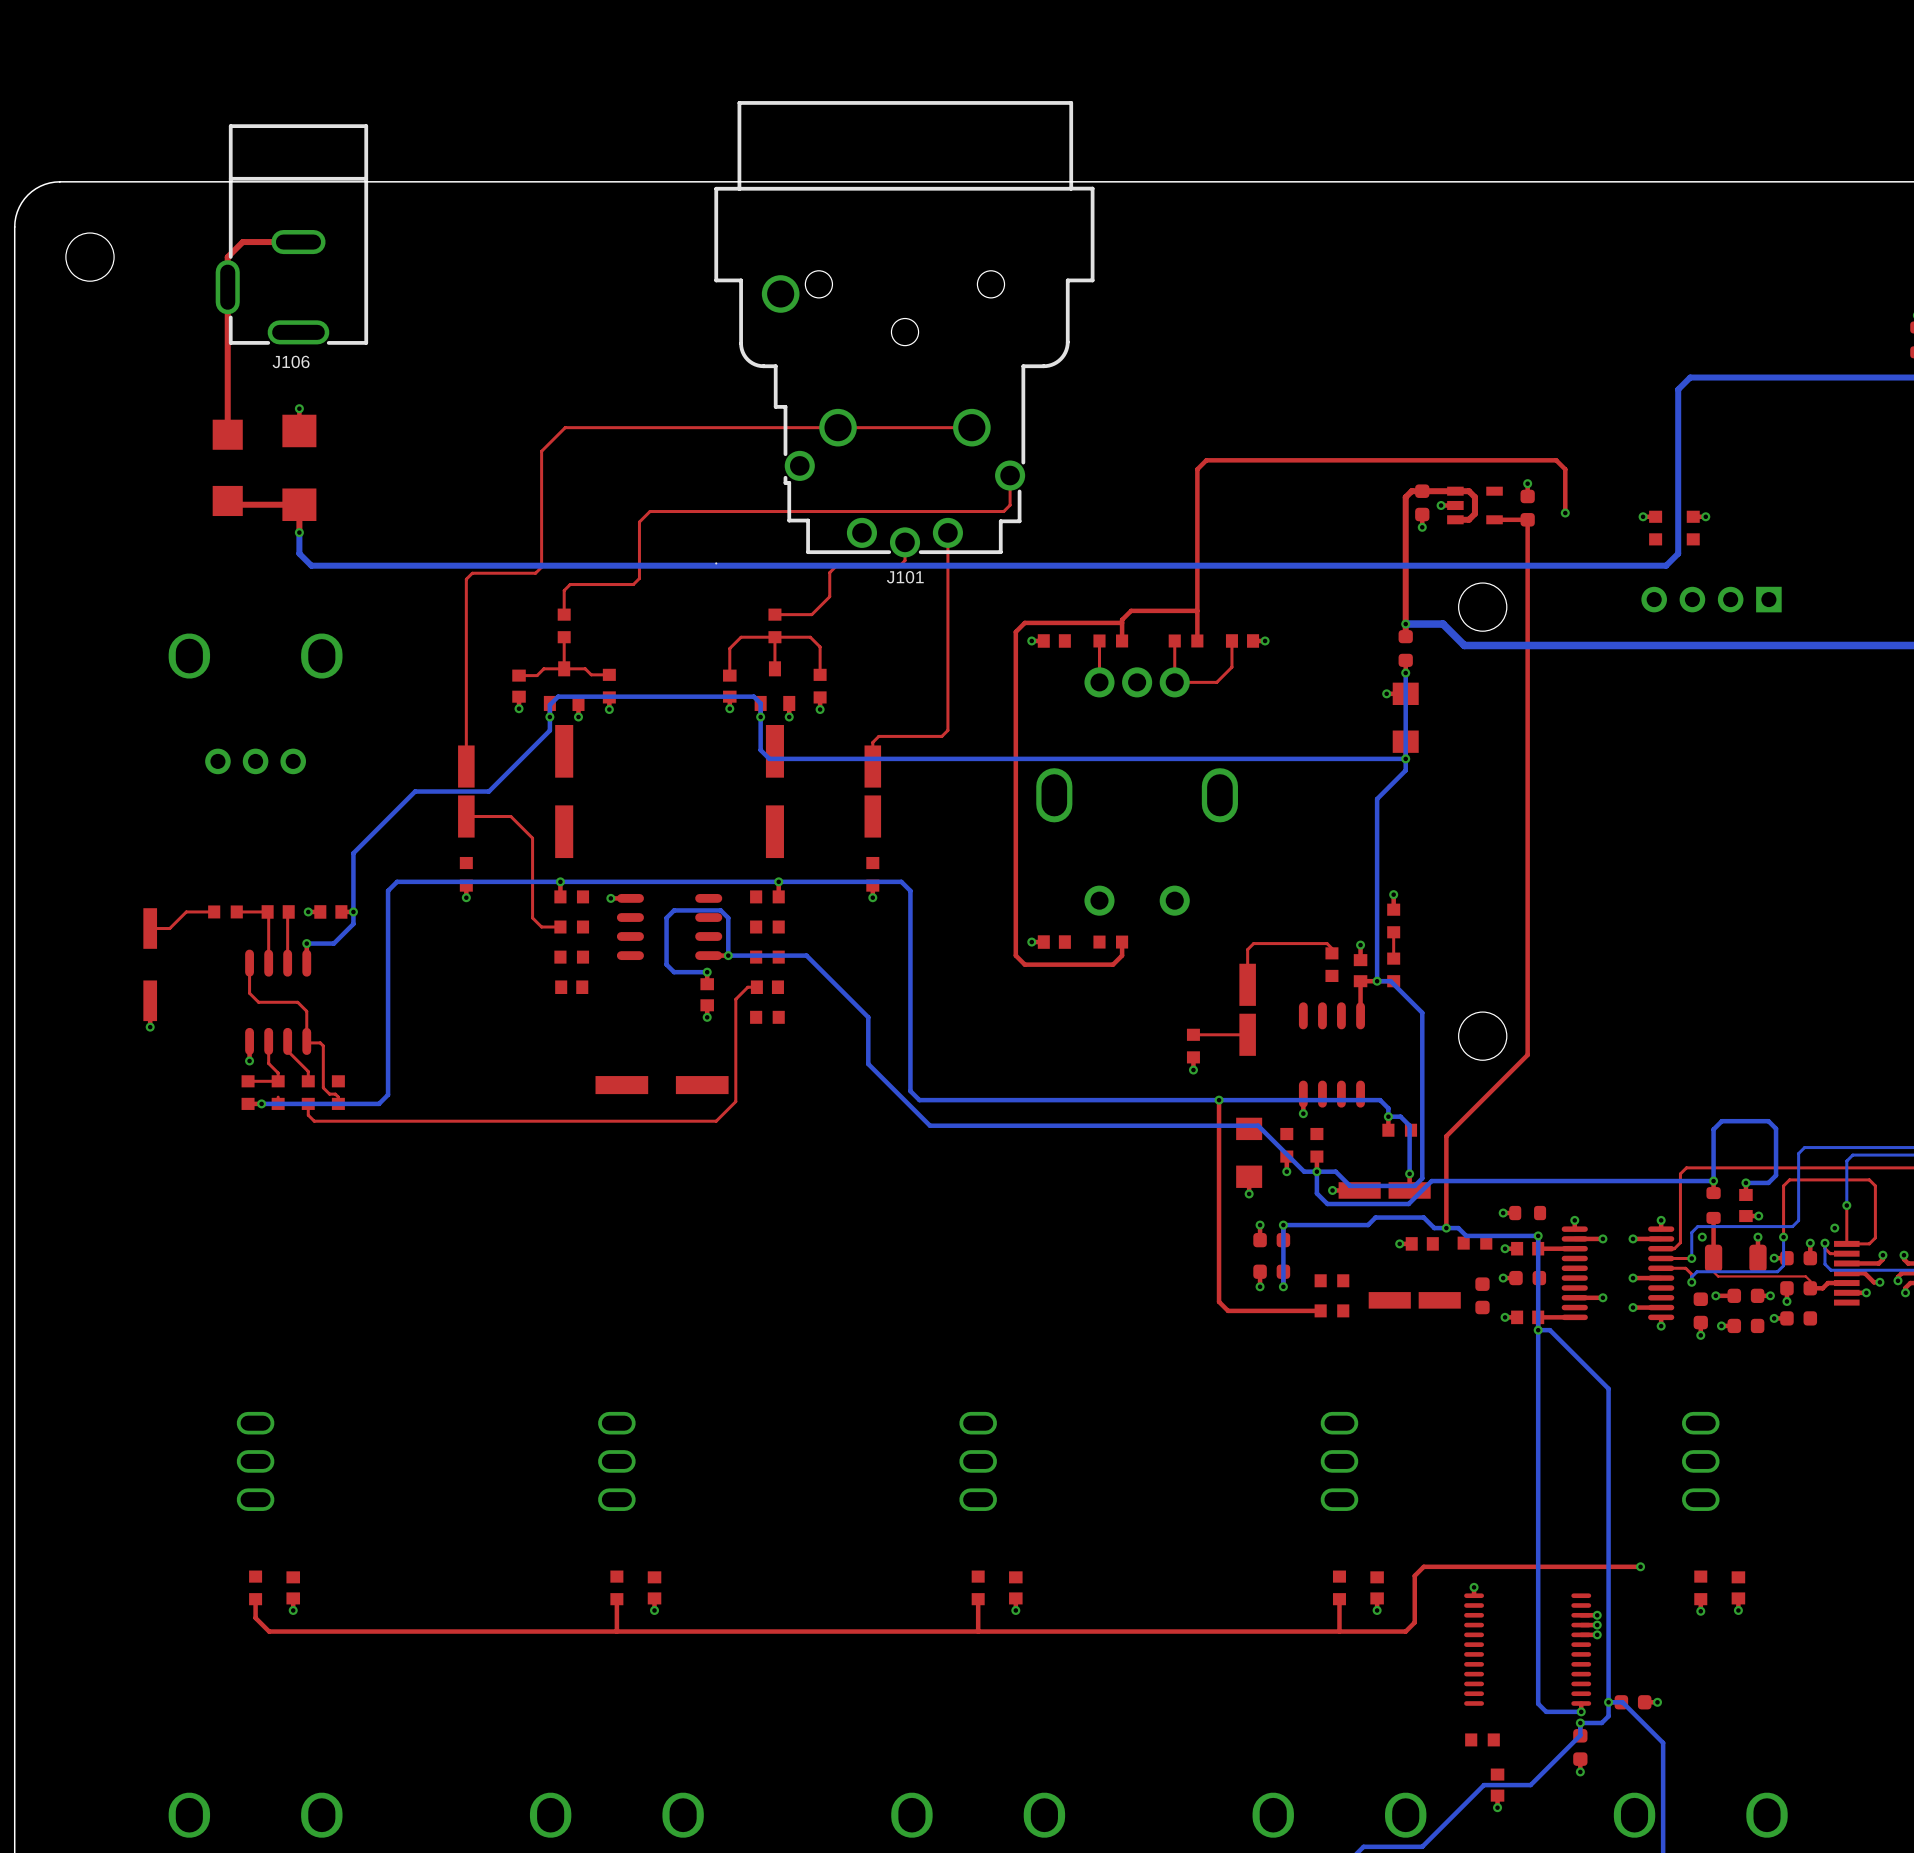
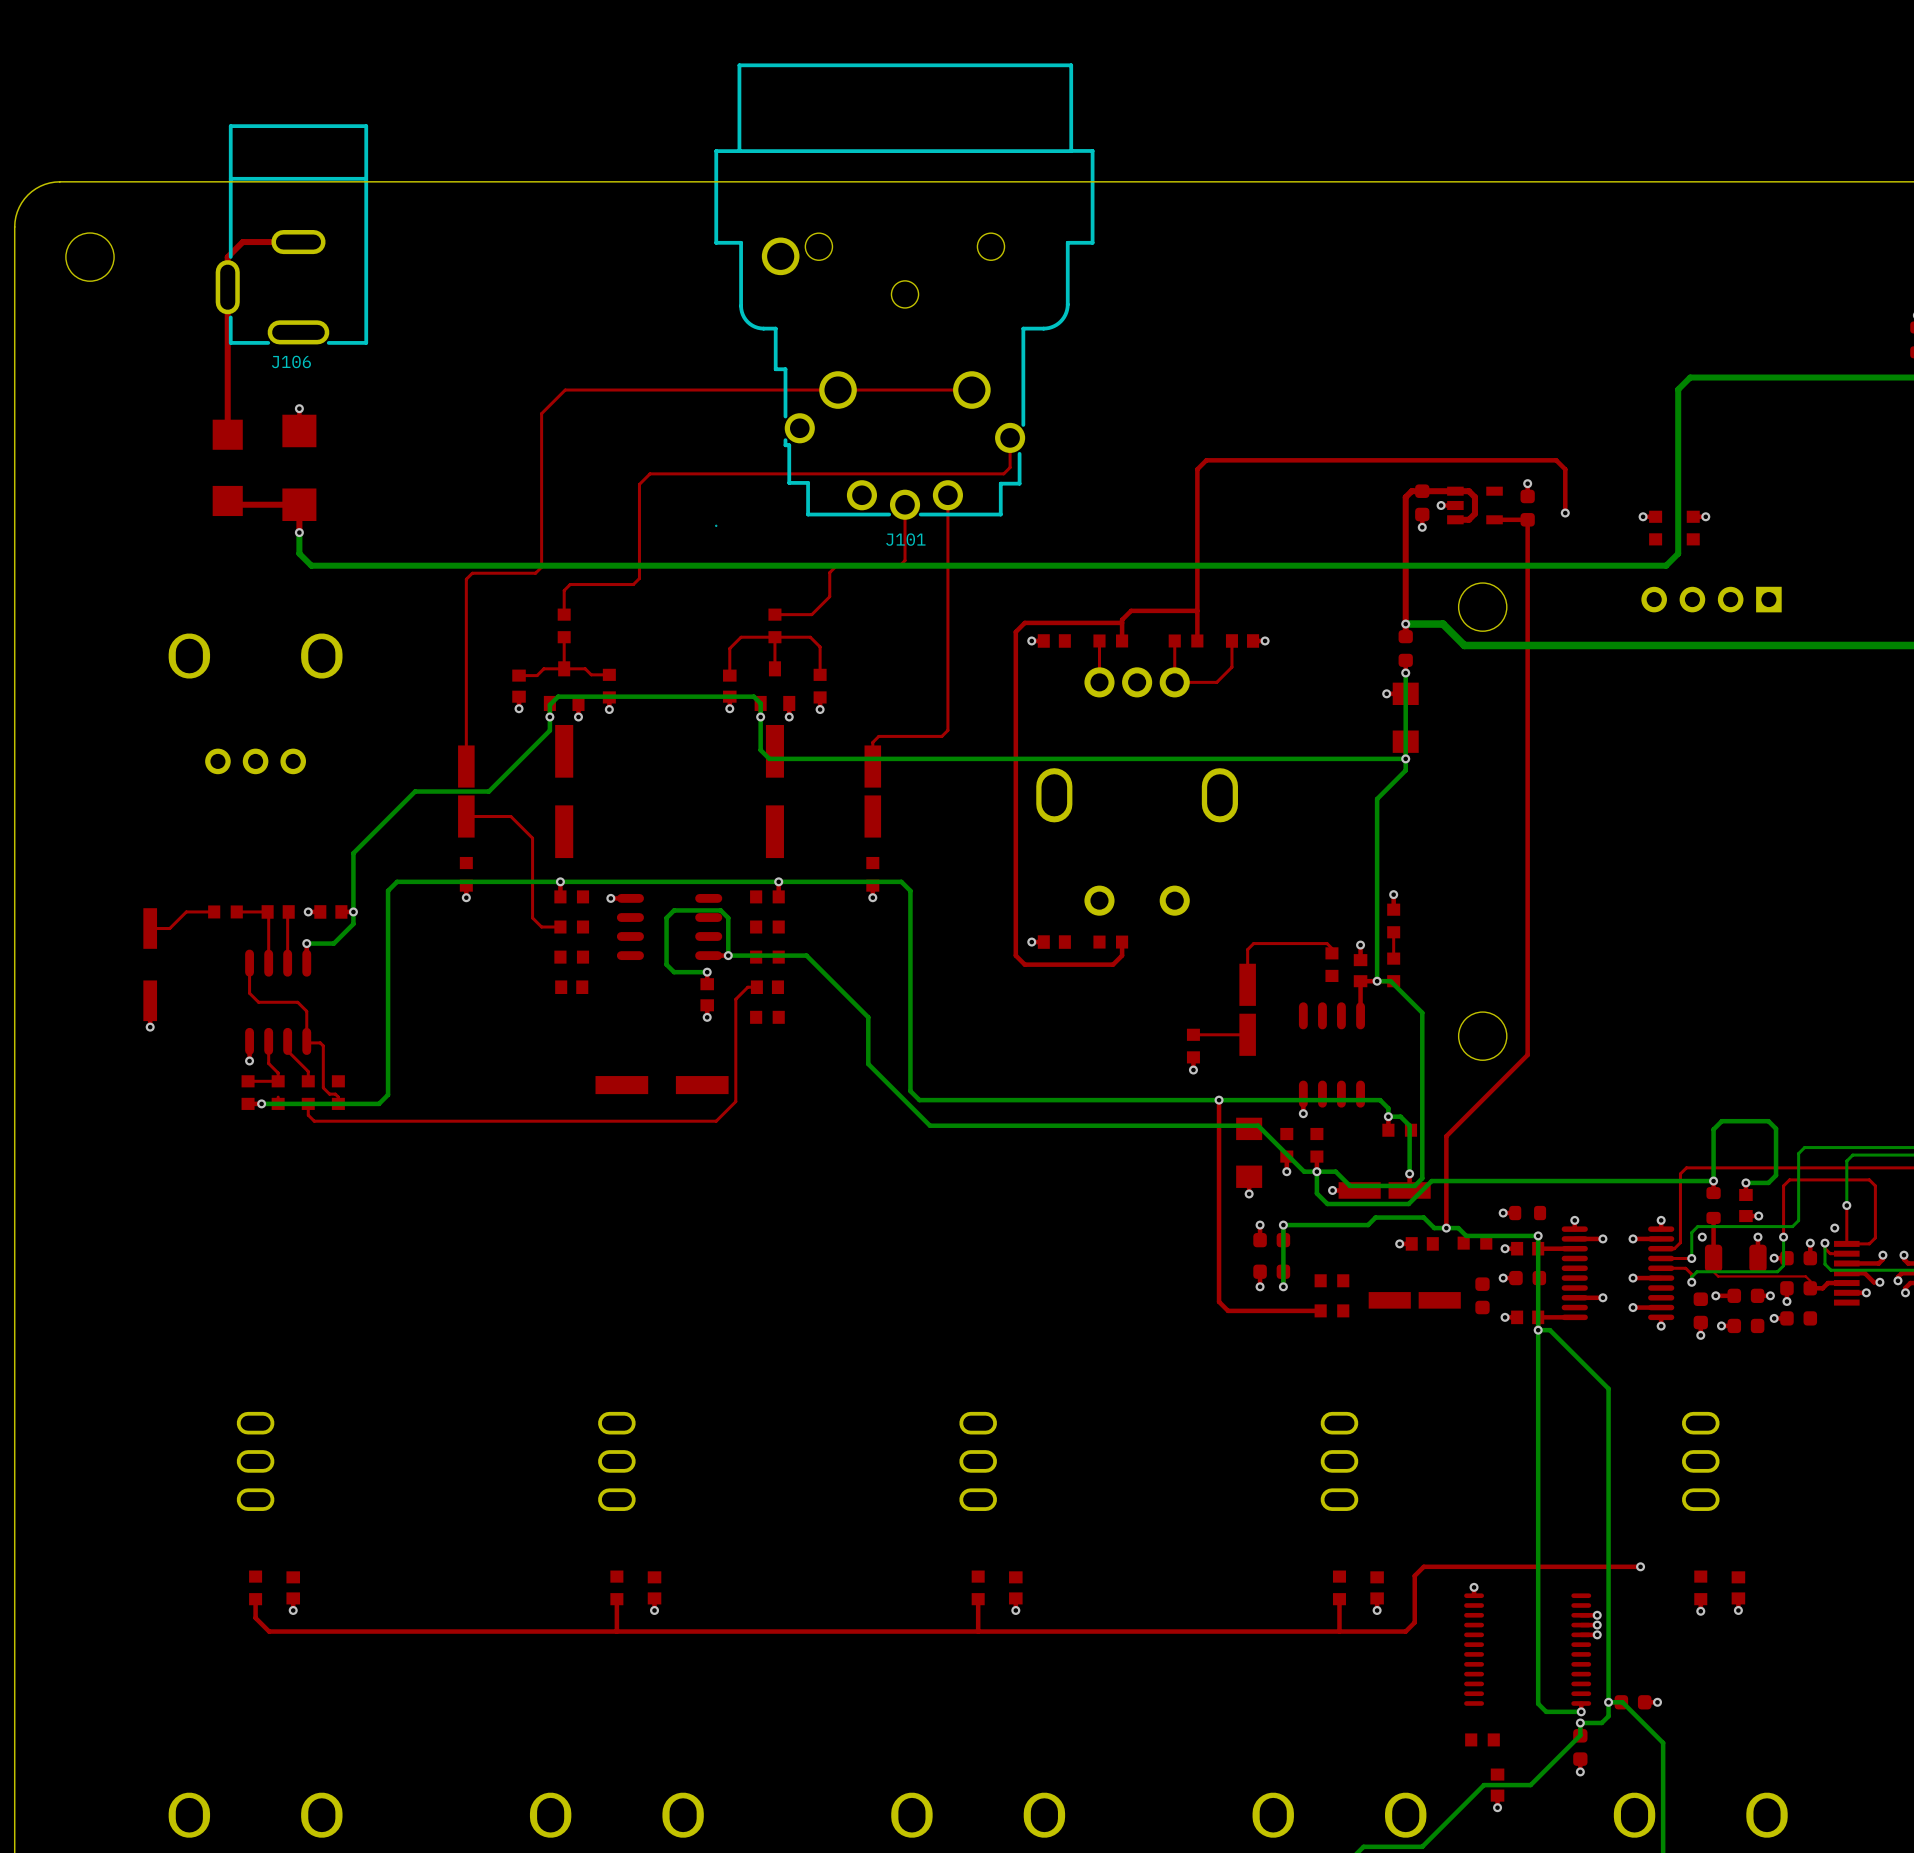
J101 position: (904, 332) -> (904, 295)
top track: (971, 427) (565, 427) (541, 451) -> (971, 390) (565, 390) (541, 413) (541, 451)
top track: (1010, 475) (1010, 505) (1003, 511) (650, 511) (639, 522) -> (1010, 437) (1010, 467) (1003, 473) (650, 473) (639, 484) (639, 522)
top track: none -> (947, 495) (947, 532)
top track: none -> (905, 504) (905, 542)

